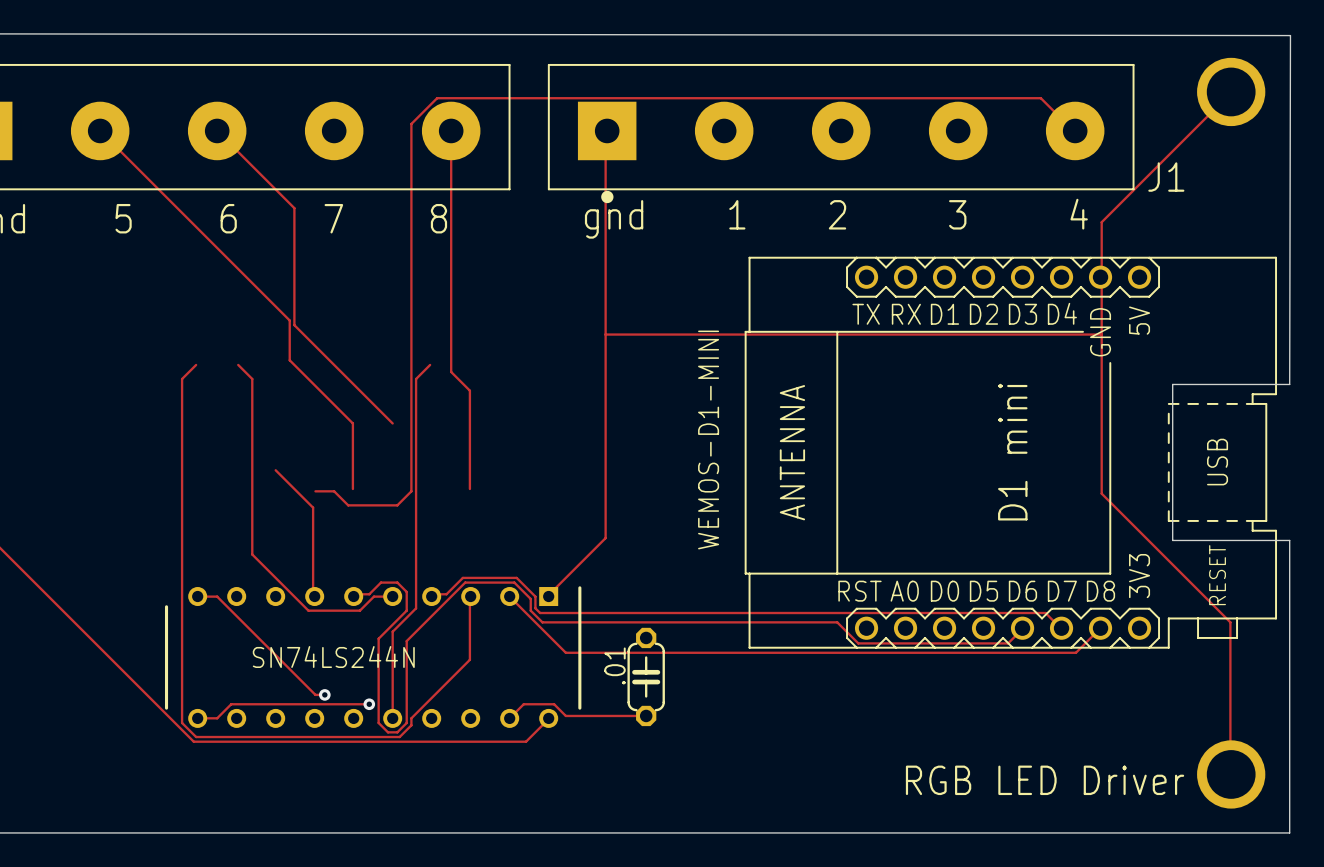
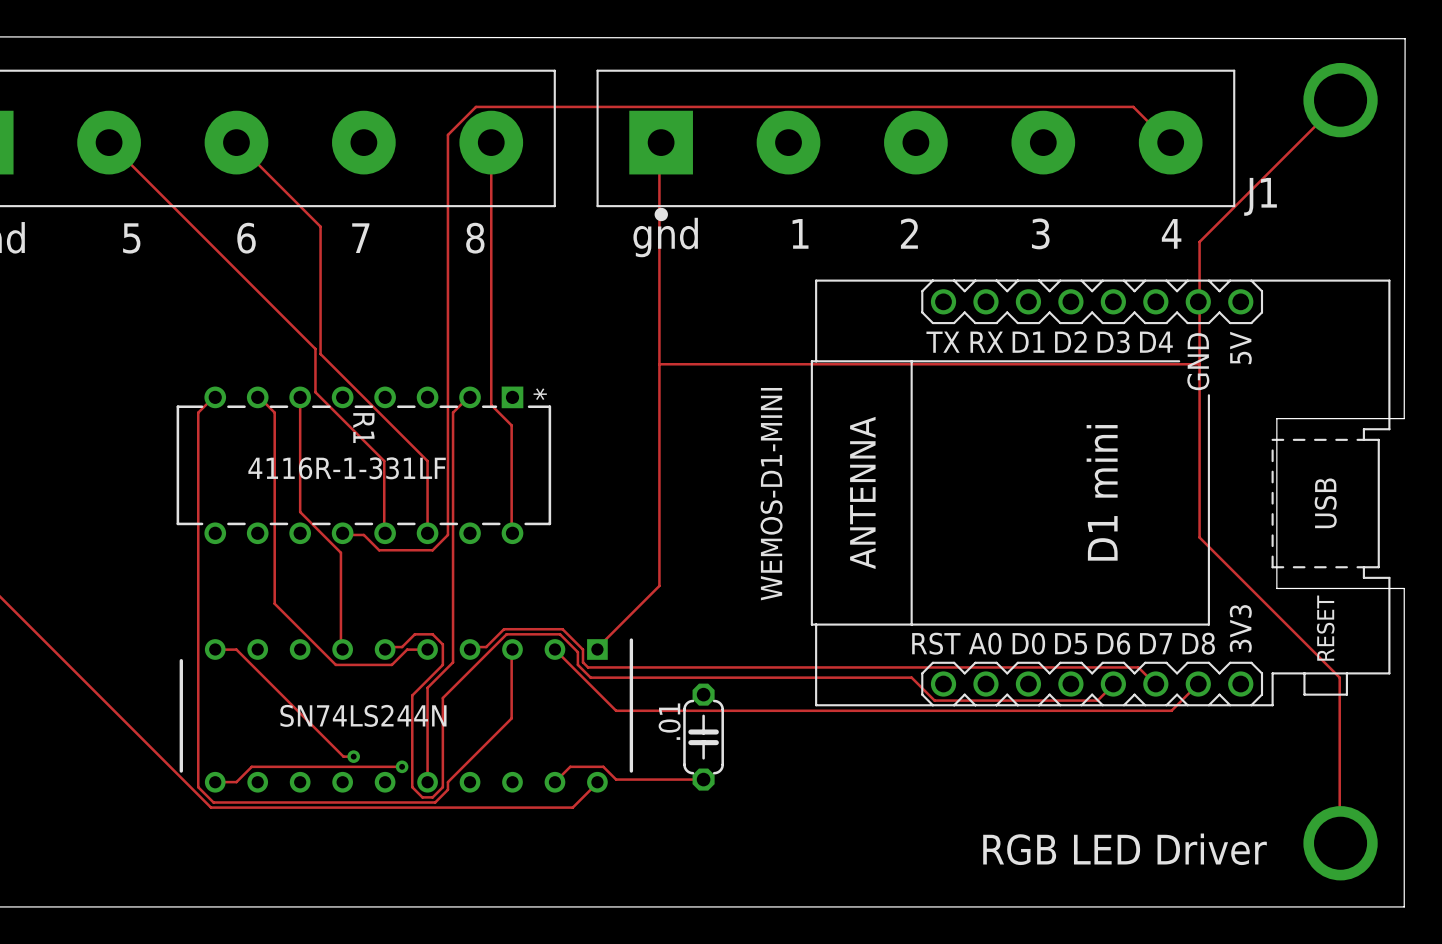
track: none -> (300, 397) (300, 512)
track: none -> (427, 461) (427, 533)
R1: none -> 4116R-1-331LF (363, 465)

